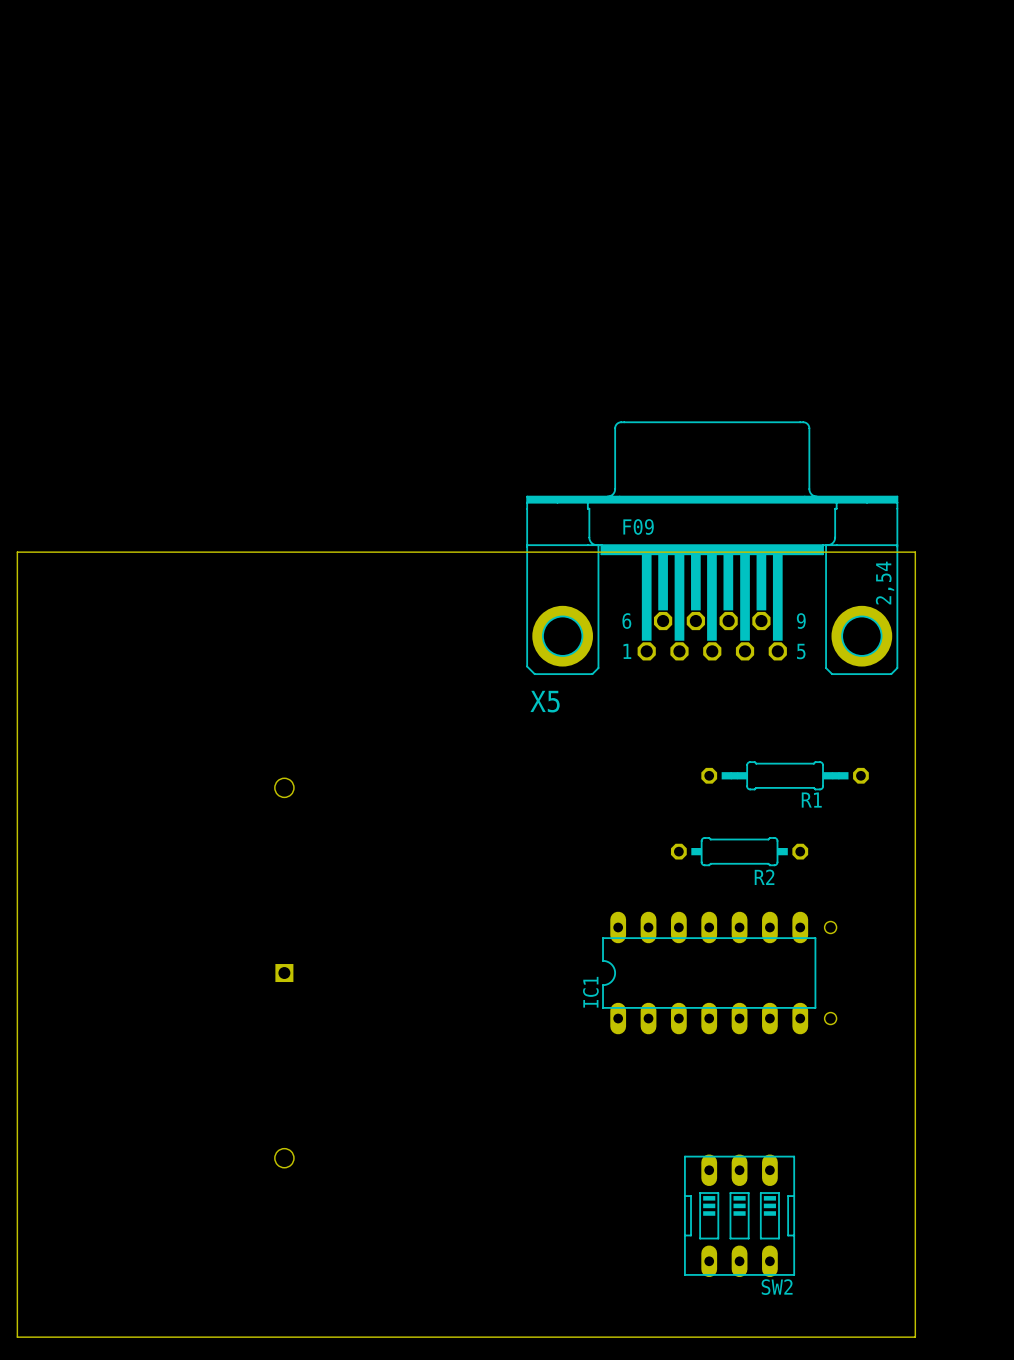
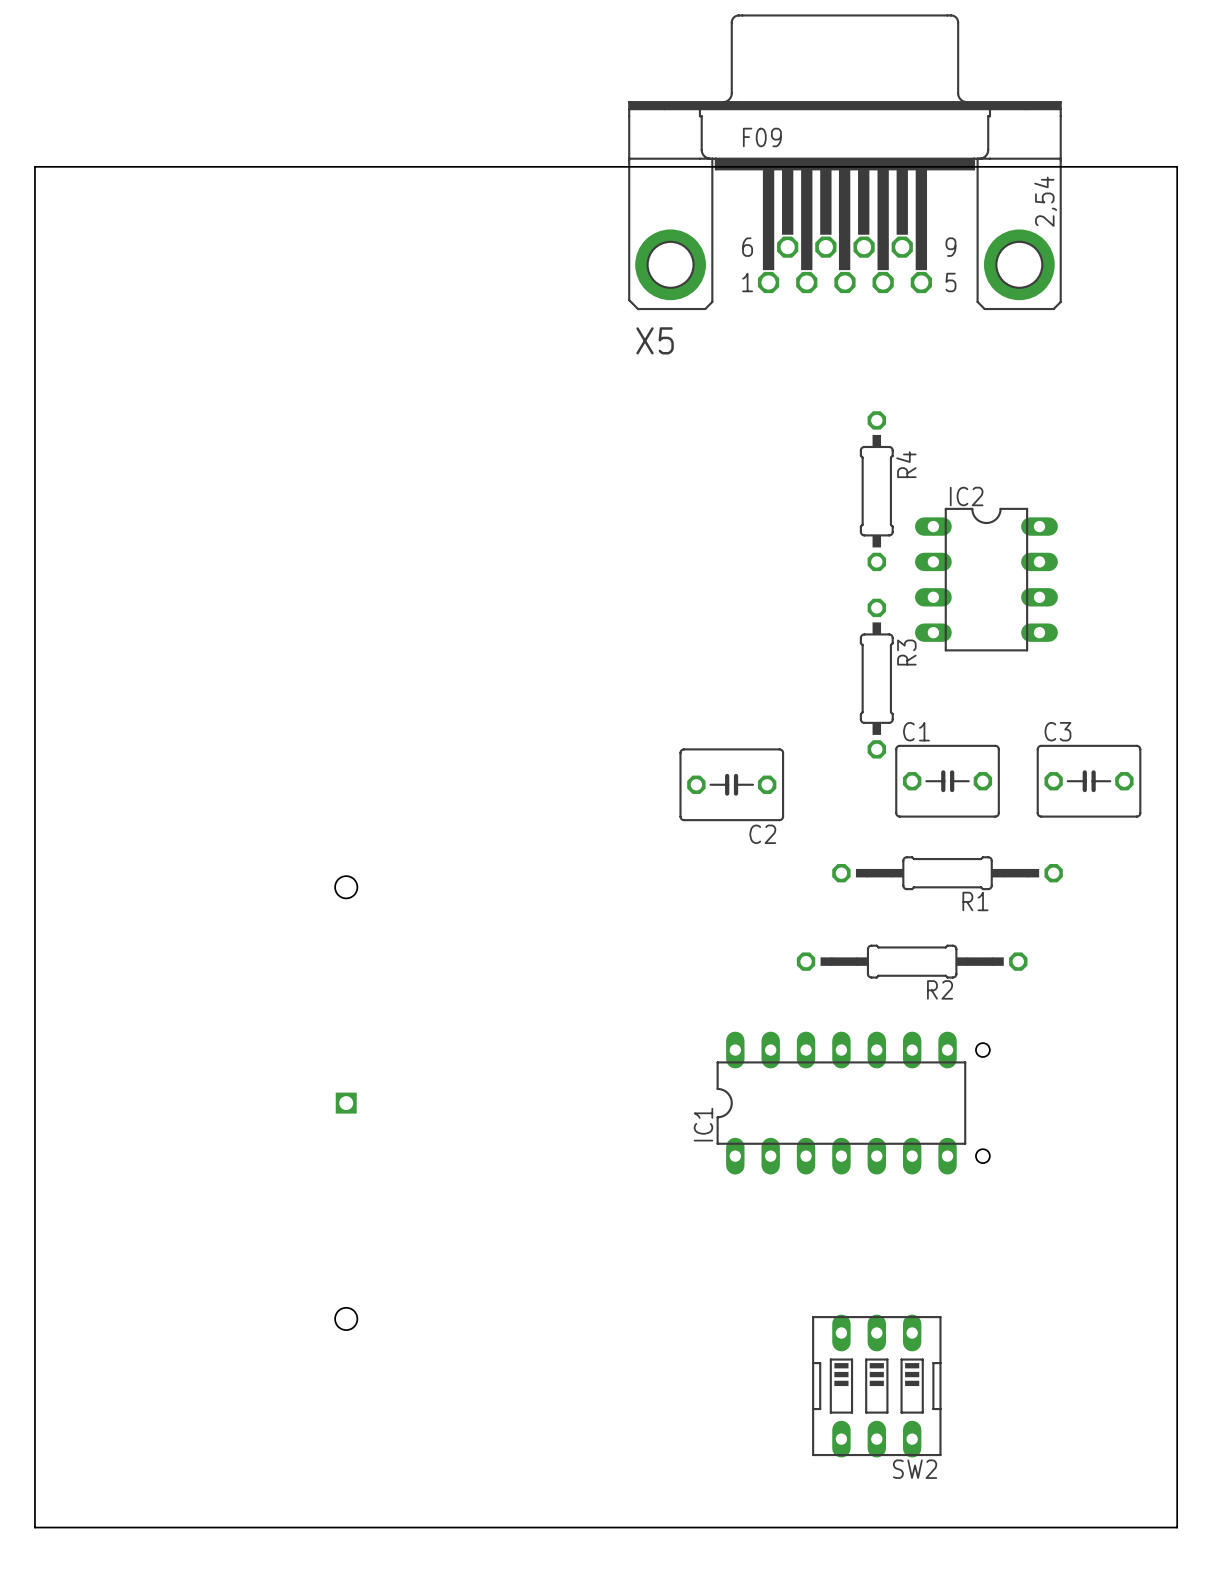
R4: none -> (876, 491)
IC2: none -> (986, 579)
X5 position: (712, 548) -> (844, 162)
board edge: (17, 552) (915, 552) (915, 1337) -> (34, 612) (34, 166) (1177, 166) (1177, 1527) (1081, 1527)
R3: none -> (876, 678)
C1: none -> (947, 781)
C3: none -> (1089, 781)
C2: none -> (731, 784)
R1 footprint: [701, 761, 869, 791] -> [832, 856, 1063, 891]
R2 footprint: [670, 837, 809, 867] -> [796, 944, 1028, 979]

